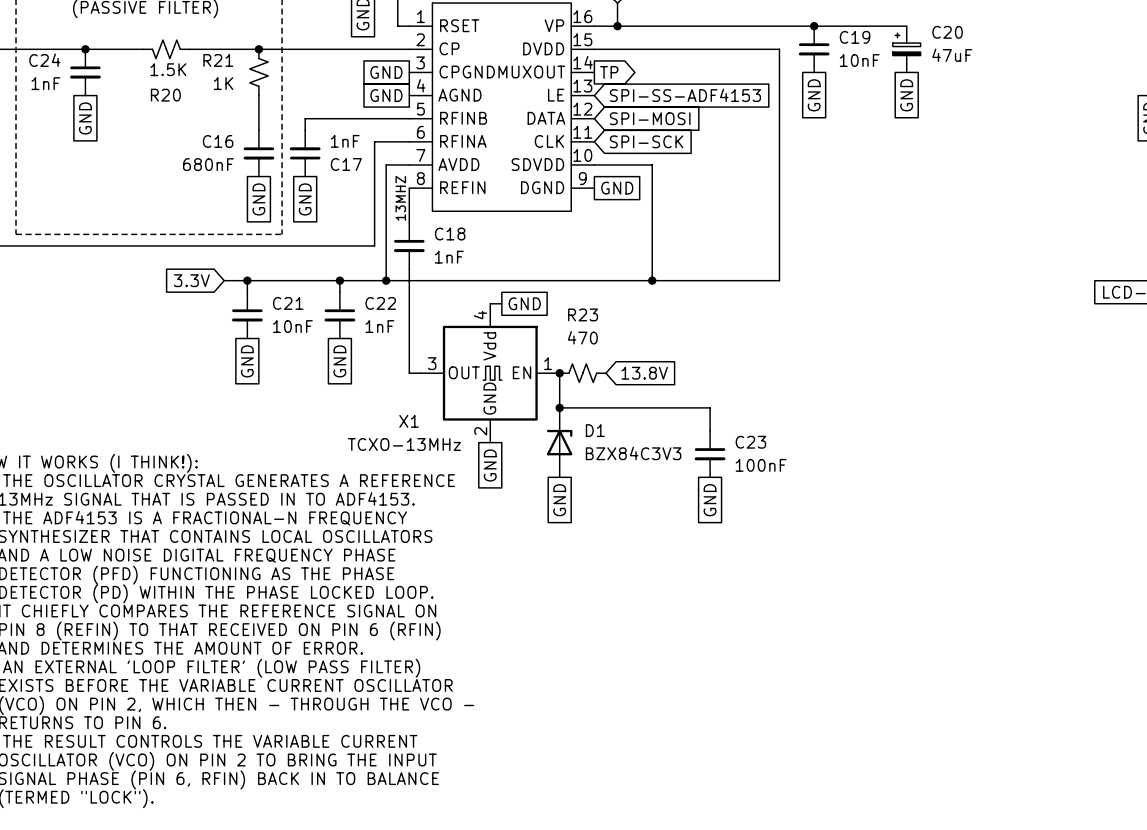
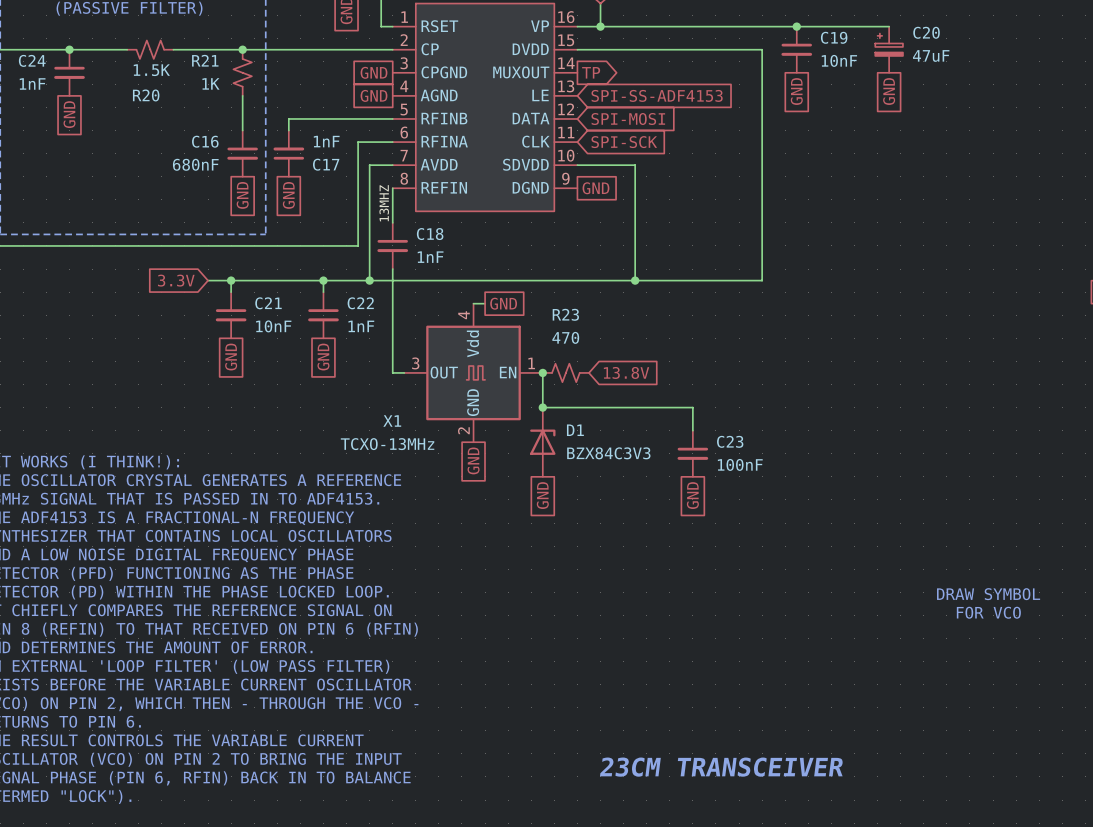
text: none -> DRAW SYMBOL (988, 594)
text: none -> FOR VCO (988, 612)
text: none -> 23CM TRANSCEIVER (721, 767)

